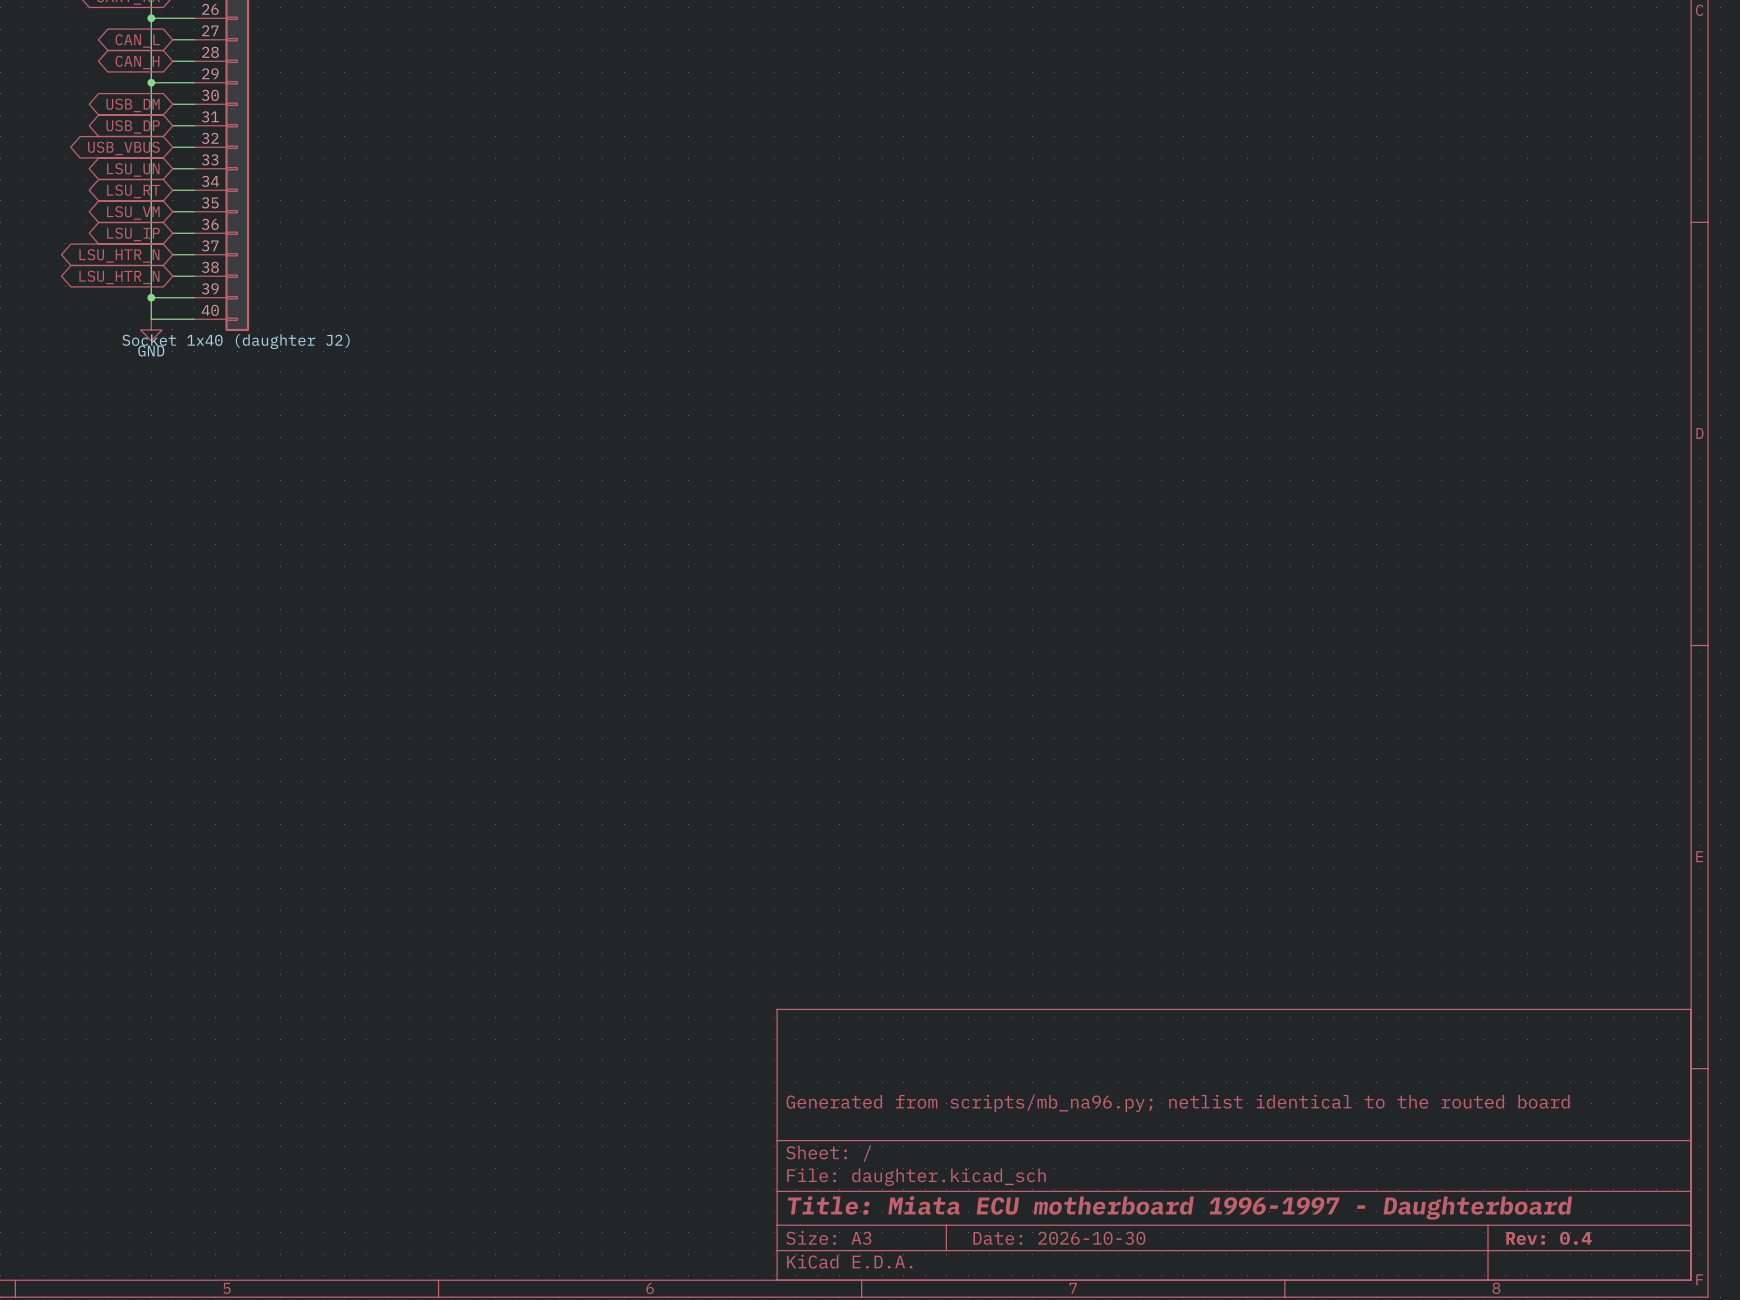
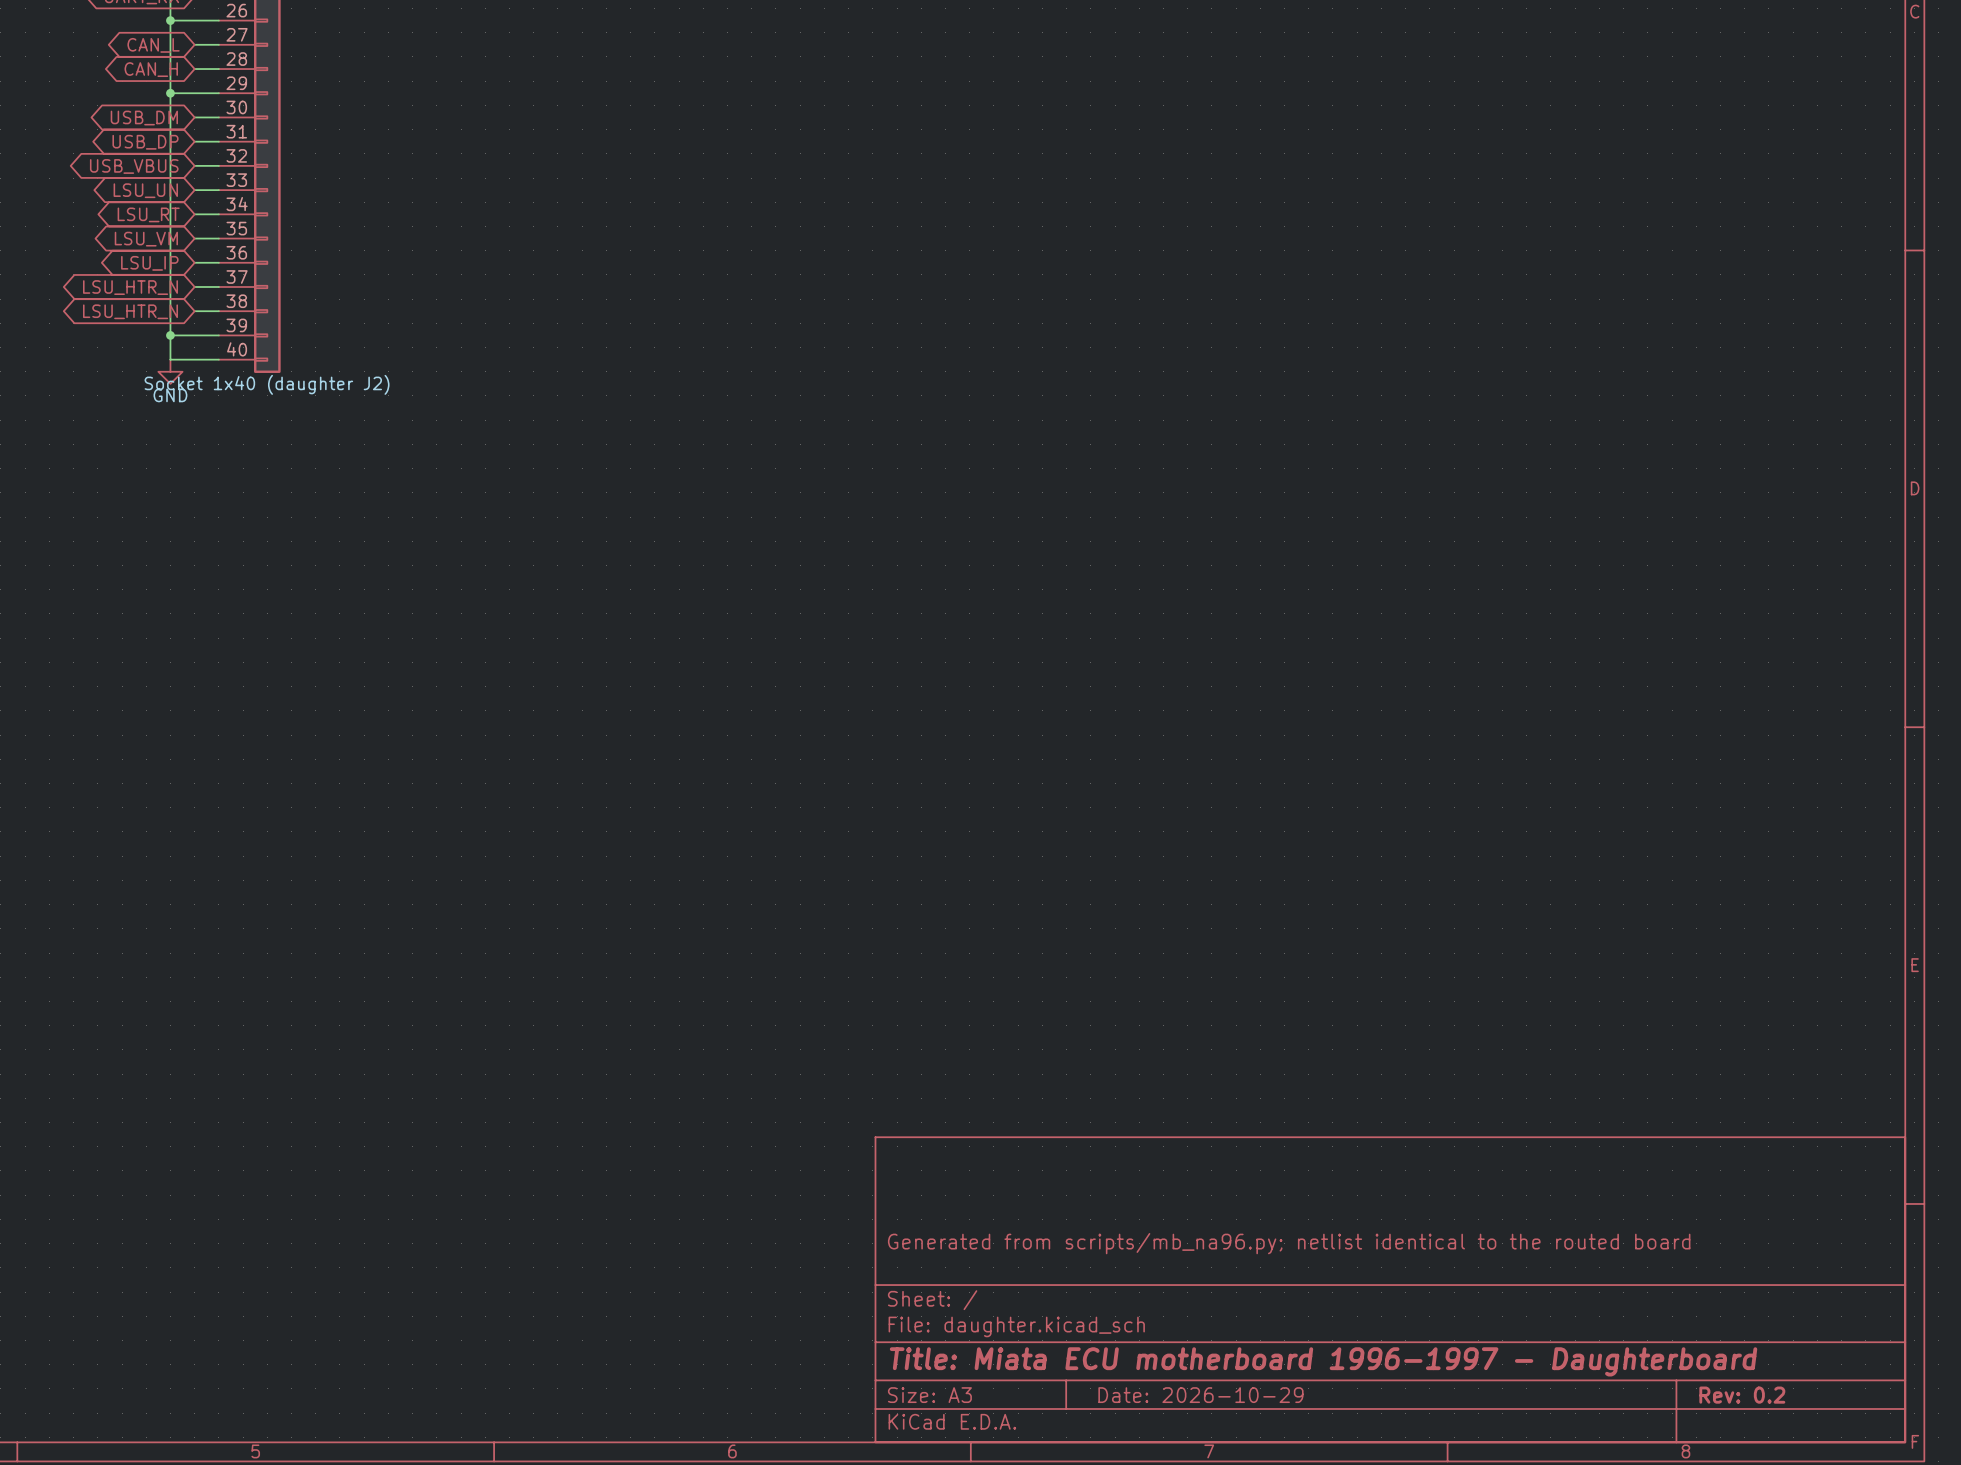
title block: Date: 2026-10-30 (1059, 1238) -> Date: 2026-10-29 (1200, 1395)
title block: Rev: 0.4 (1549, 1238) -> Rev: 0.2 (1742, 1395)

